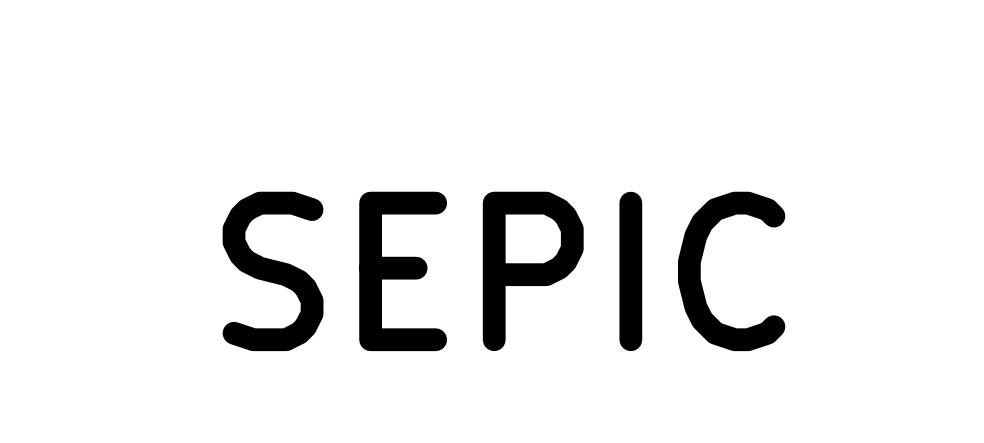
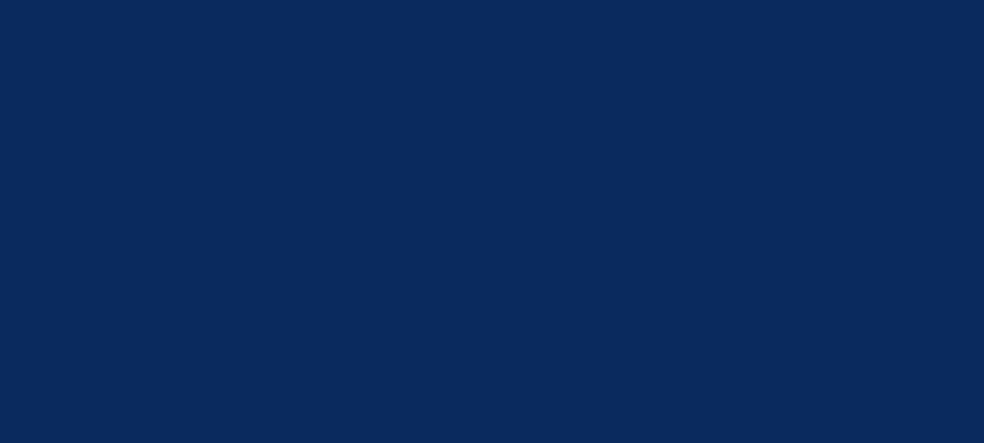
text: SEPIC (503, 271) -> none

